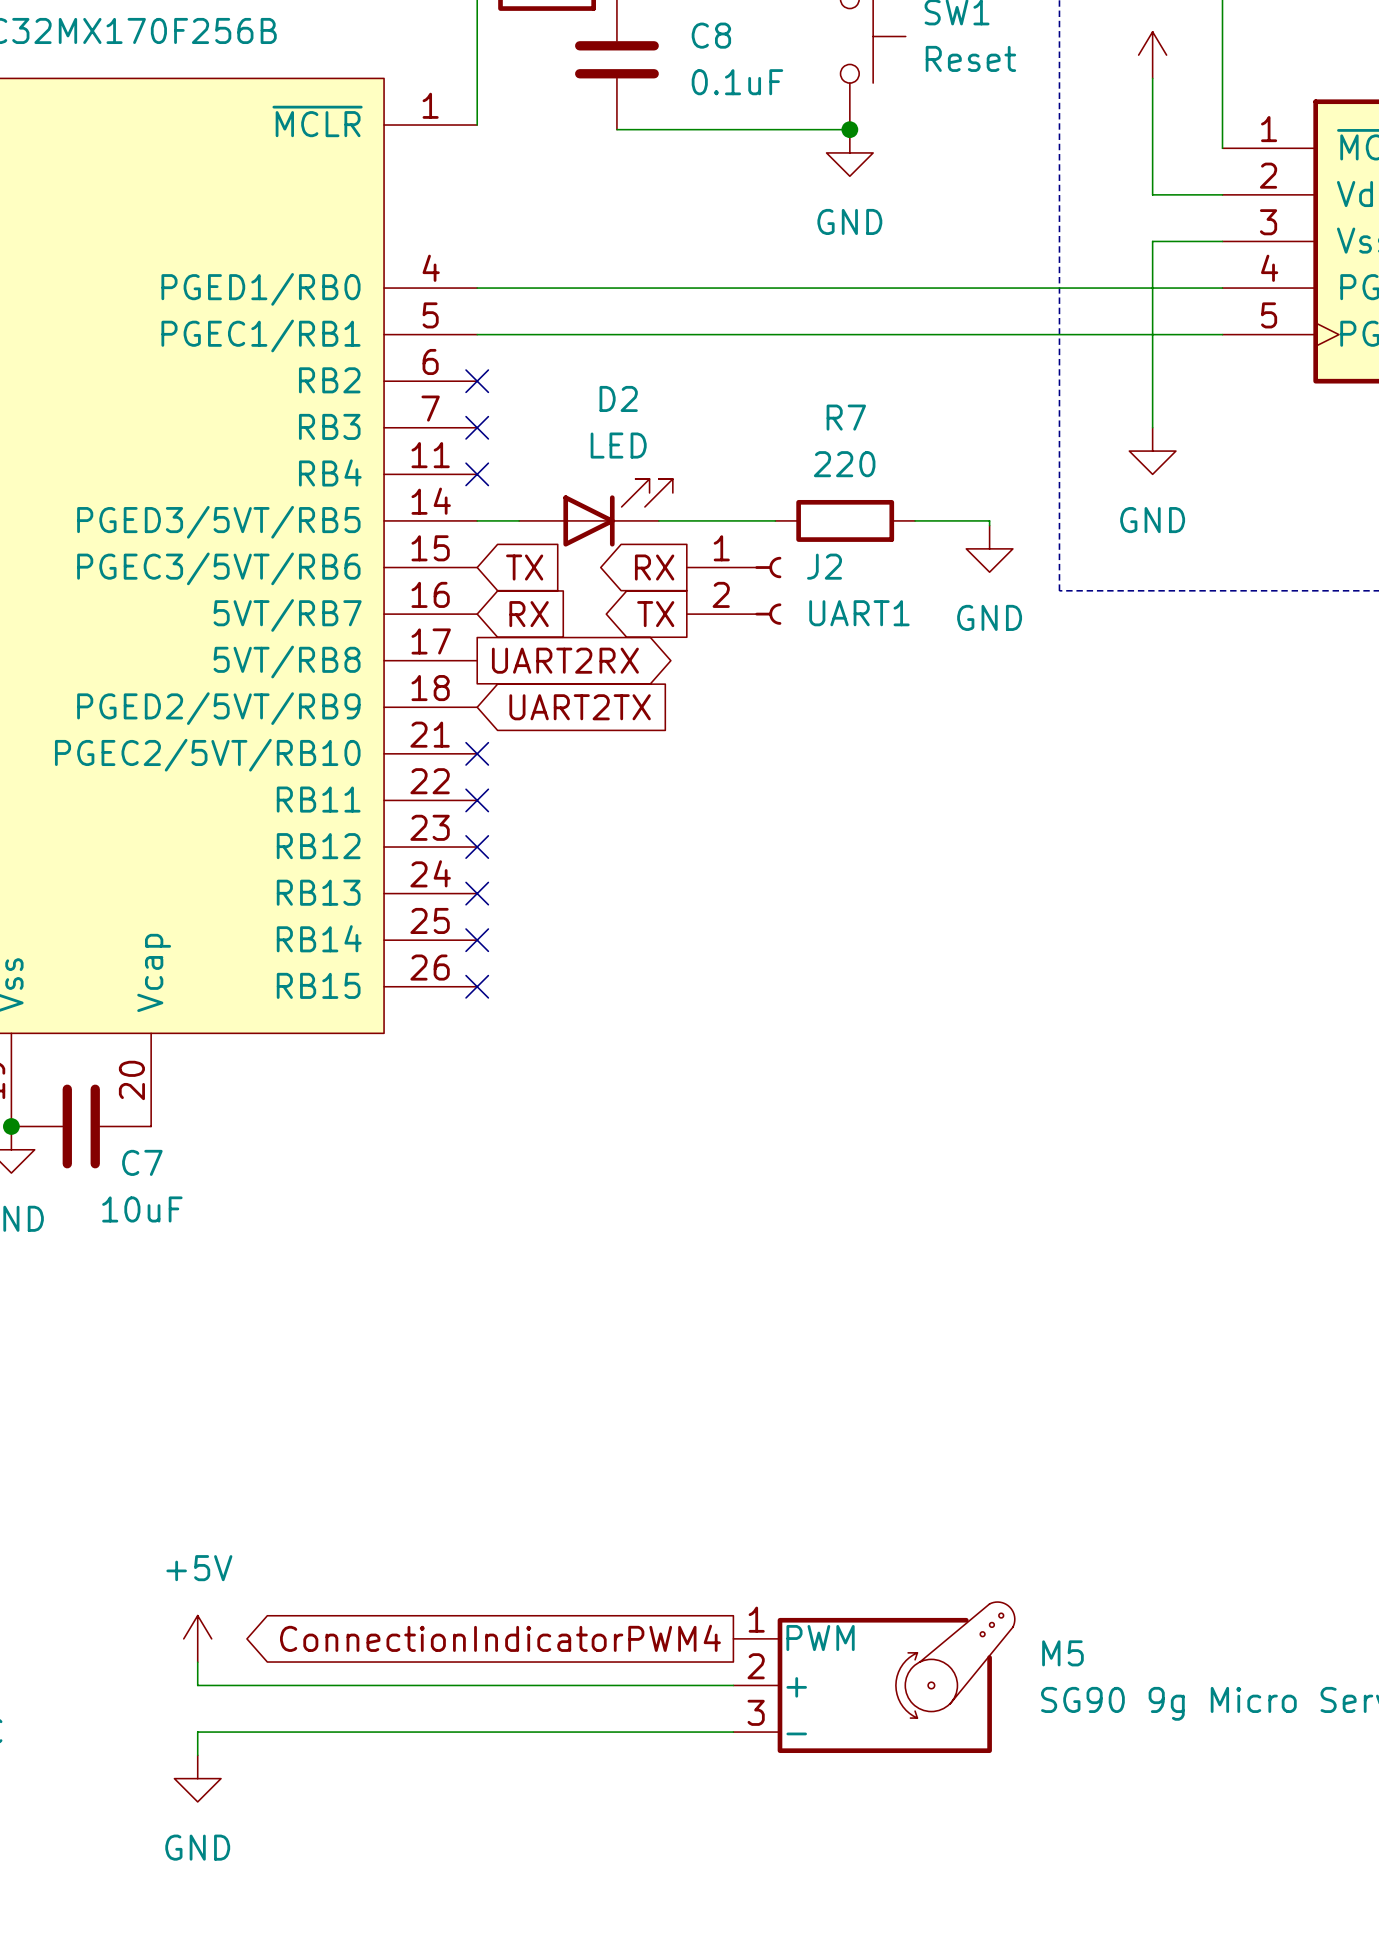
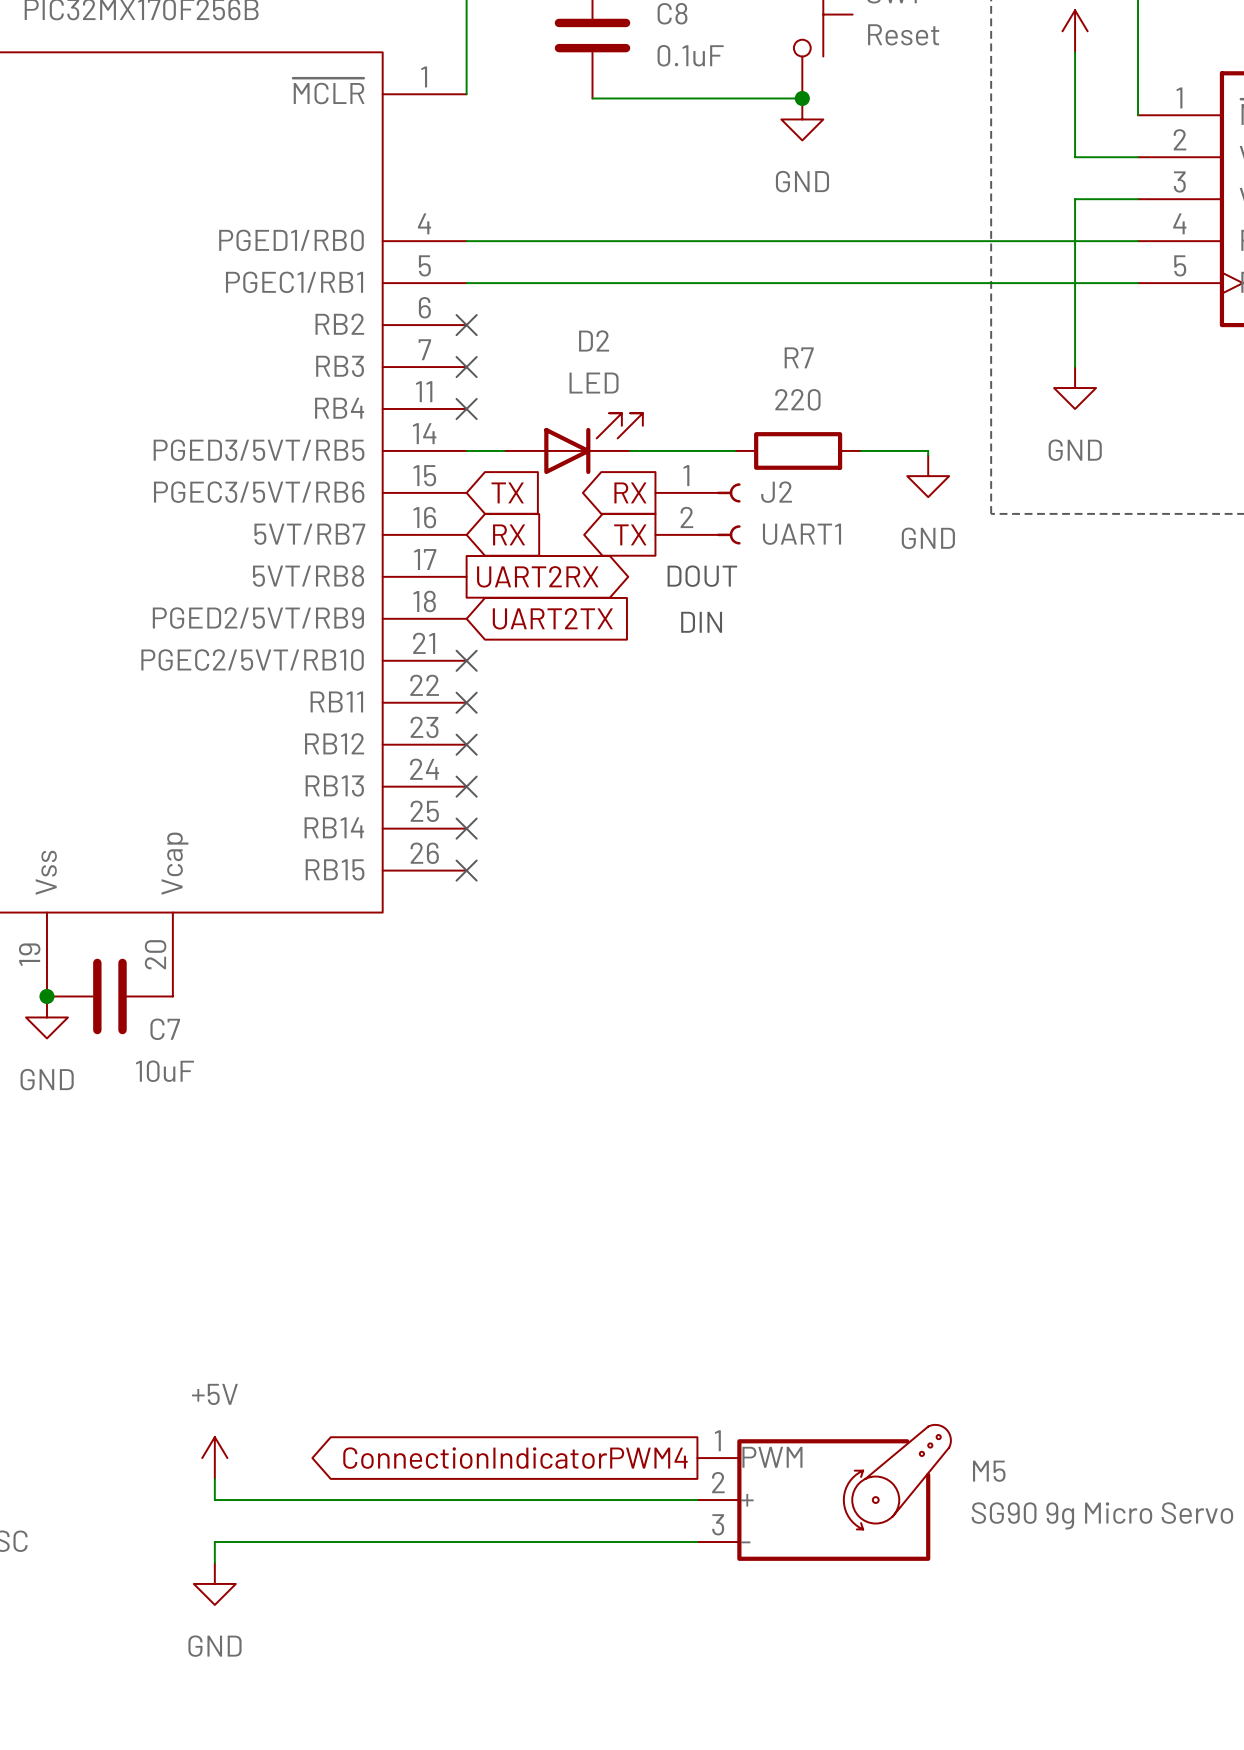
text: none -> DOUT (702, 576)
text: none -> DIN (701, 622)

